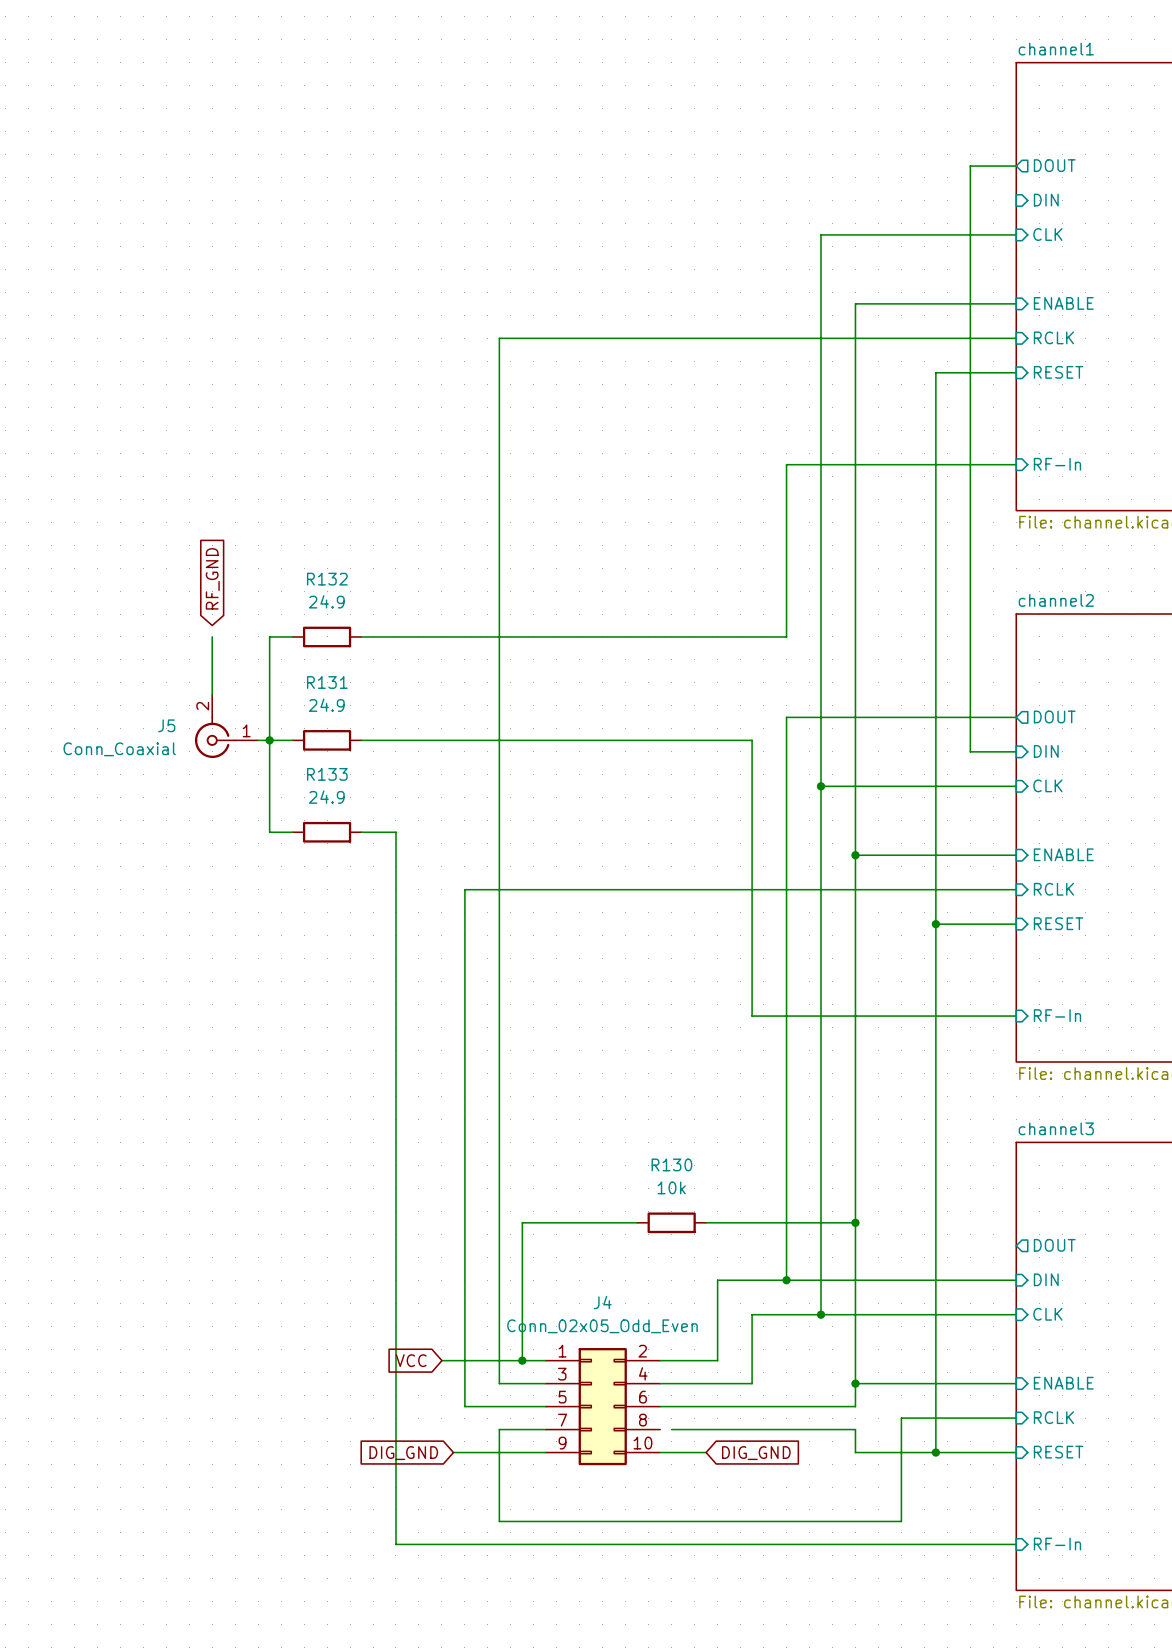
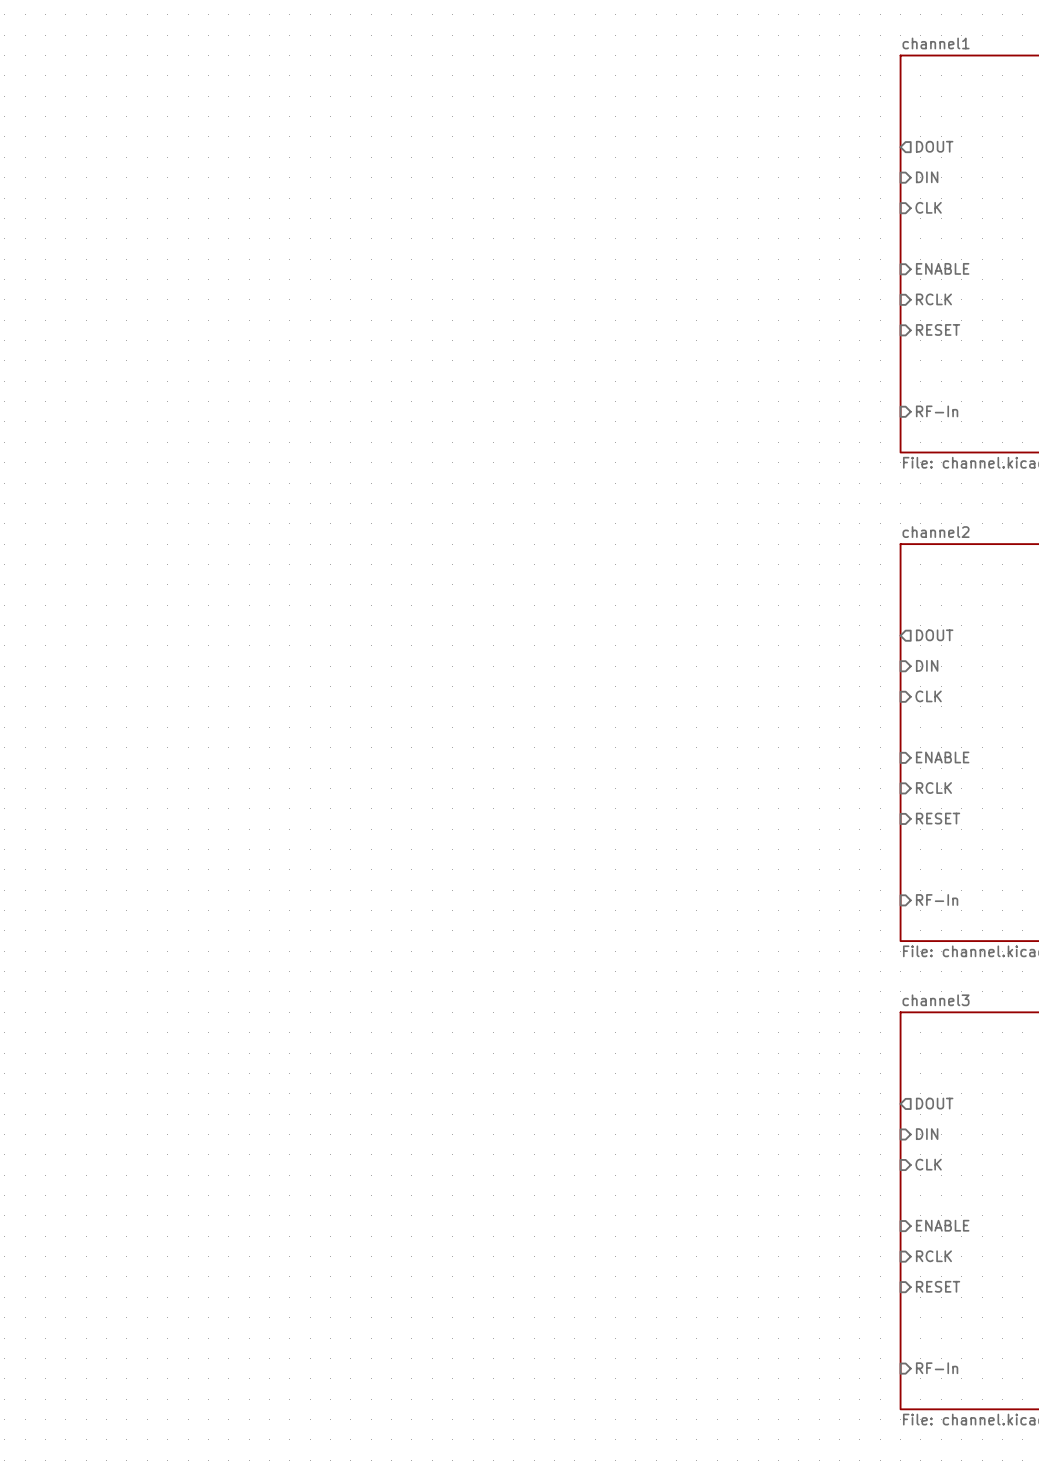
wire: (1016, 166) (970, 166) (970, 751) (1016, 751) -> none
wire: (1016, 234) (821, 234) (821, 1314) -> none
wire: (1016, 303) (855, 303) (855, 1406) (660, 1406) -> none
wire: (1016, 338) (499, 338) (499, 1383) (545, 1383) -> none
wire: (1016, 372) (935, 372) (935, 1452) -> none
wire: (1016, 464) (786, 464) (786, 636) (361, 636) -> none
global label: RF_GND (212, 578) -> none
wire: (212, 636) (212, 694) -> none
wire: (292, 636) (269, 636) (269, 832) (292, 832) -> none
R132: 24.9 (327, 636) -> none
wire: (1016, 717) (786, 717) (786, 1280) -> none
J5: Conn_Coaxial (226, 726) -> none
wire: (258, 740) (292, 740) -> none
junction: (269, 740) -> none
R131: 24.9 (327, 740) -> none
wire: (361, 740) (752, 740) (752, 1016) (1016, 1016) -> none
wire: (821, 786) (1016, 786) -> none
junction: (821, 786) -> none
R133: 24.9 (327, 832) -> none
wire: (361, 832) (395, 832) (395, 1544) (1016, 1544) -> none
wire: (855, 855) (1016, 855) -> none
junction: (855, 855) -> none
wire: (1016, 889) (464, 889) (464, 1406) (545, 1406) -> none
wire: (935, 924) (1016, 924) -> none
junction: (935, 924) -> none
wire: (637, 1222) (522, 1222) (522, 1360) -> none
R130: 10k (671, 1222) -> none
wire: (706, 1222) (855, 1222) -> none
junction: (855, 1222) -> none
junction: (786, 1280) -> none
wire: (1016, 1280) (717, 1280) (717, 1360) (660, 1360) -> none
junction: (821, 1314) -> none
wire: (1016, 1314) (752, 1314) (752, 1383) (660, 1383) -> none
global label: VCC (411, 1360) -> none
wire: (441, 1360) (545, 1360) -> none
junction: (522, 1360) -> none
wire: (855, 1383) (1016, 1383) -> none
junction: (855, 1383) -> none
J4: Conn_02x05_Odd_Even (602, 1406) -> none
wire: (1016, 1418) (901, 1418) (901, 1521) (499, 1521) (499, 1429) (545, 1429) -> none
wire: (671, 1429) (855, 1429) (855, 1452) (1016, 1452) -> none
wire: (453, 1452) (545, 1452) -> none
wire: (660, 1452) (706, 1452) -> none
junction: (935, 1452) -> none
global label: DIG_GND (403, 1453) -> none
global label: DIG_GND (756, 1453) -> none

